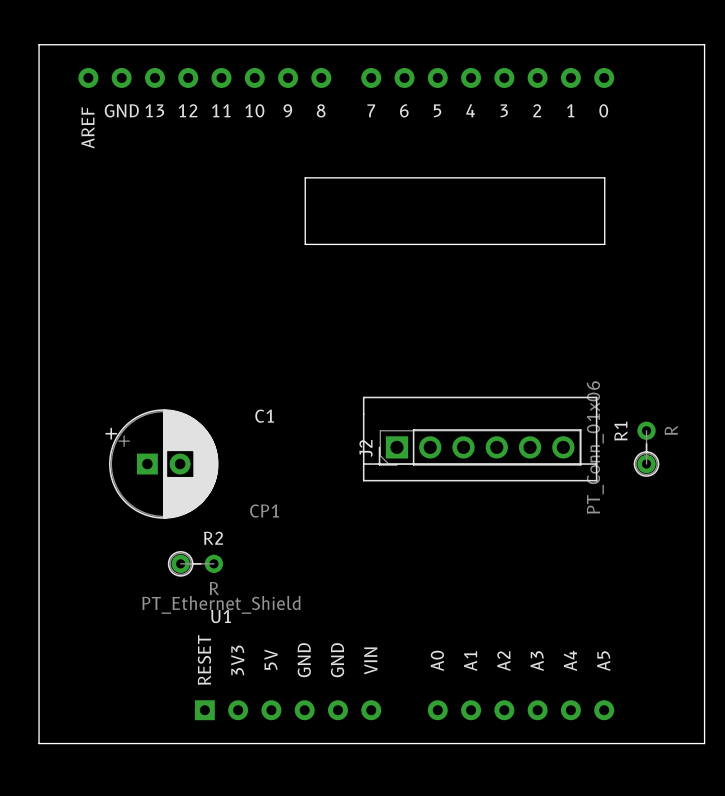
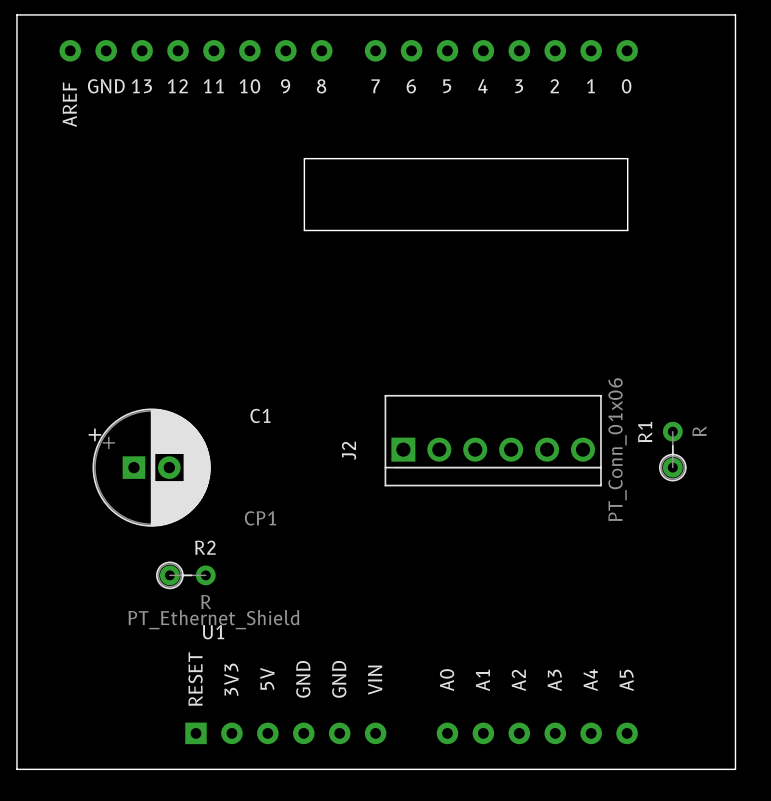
J2 footprint: [362, 396, 598, 482] -> [384, 394, 602, 487]

